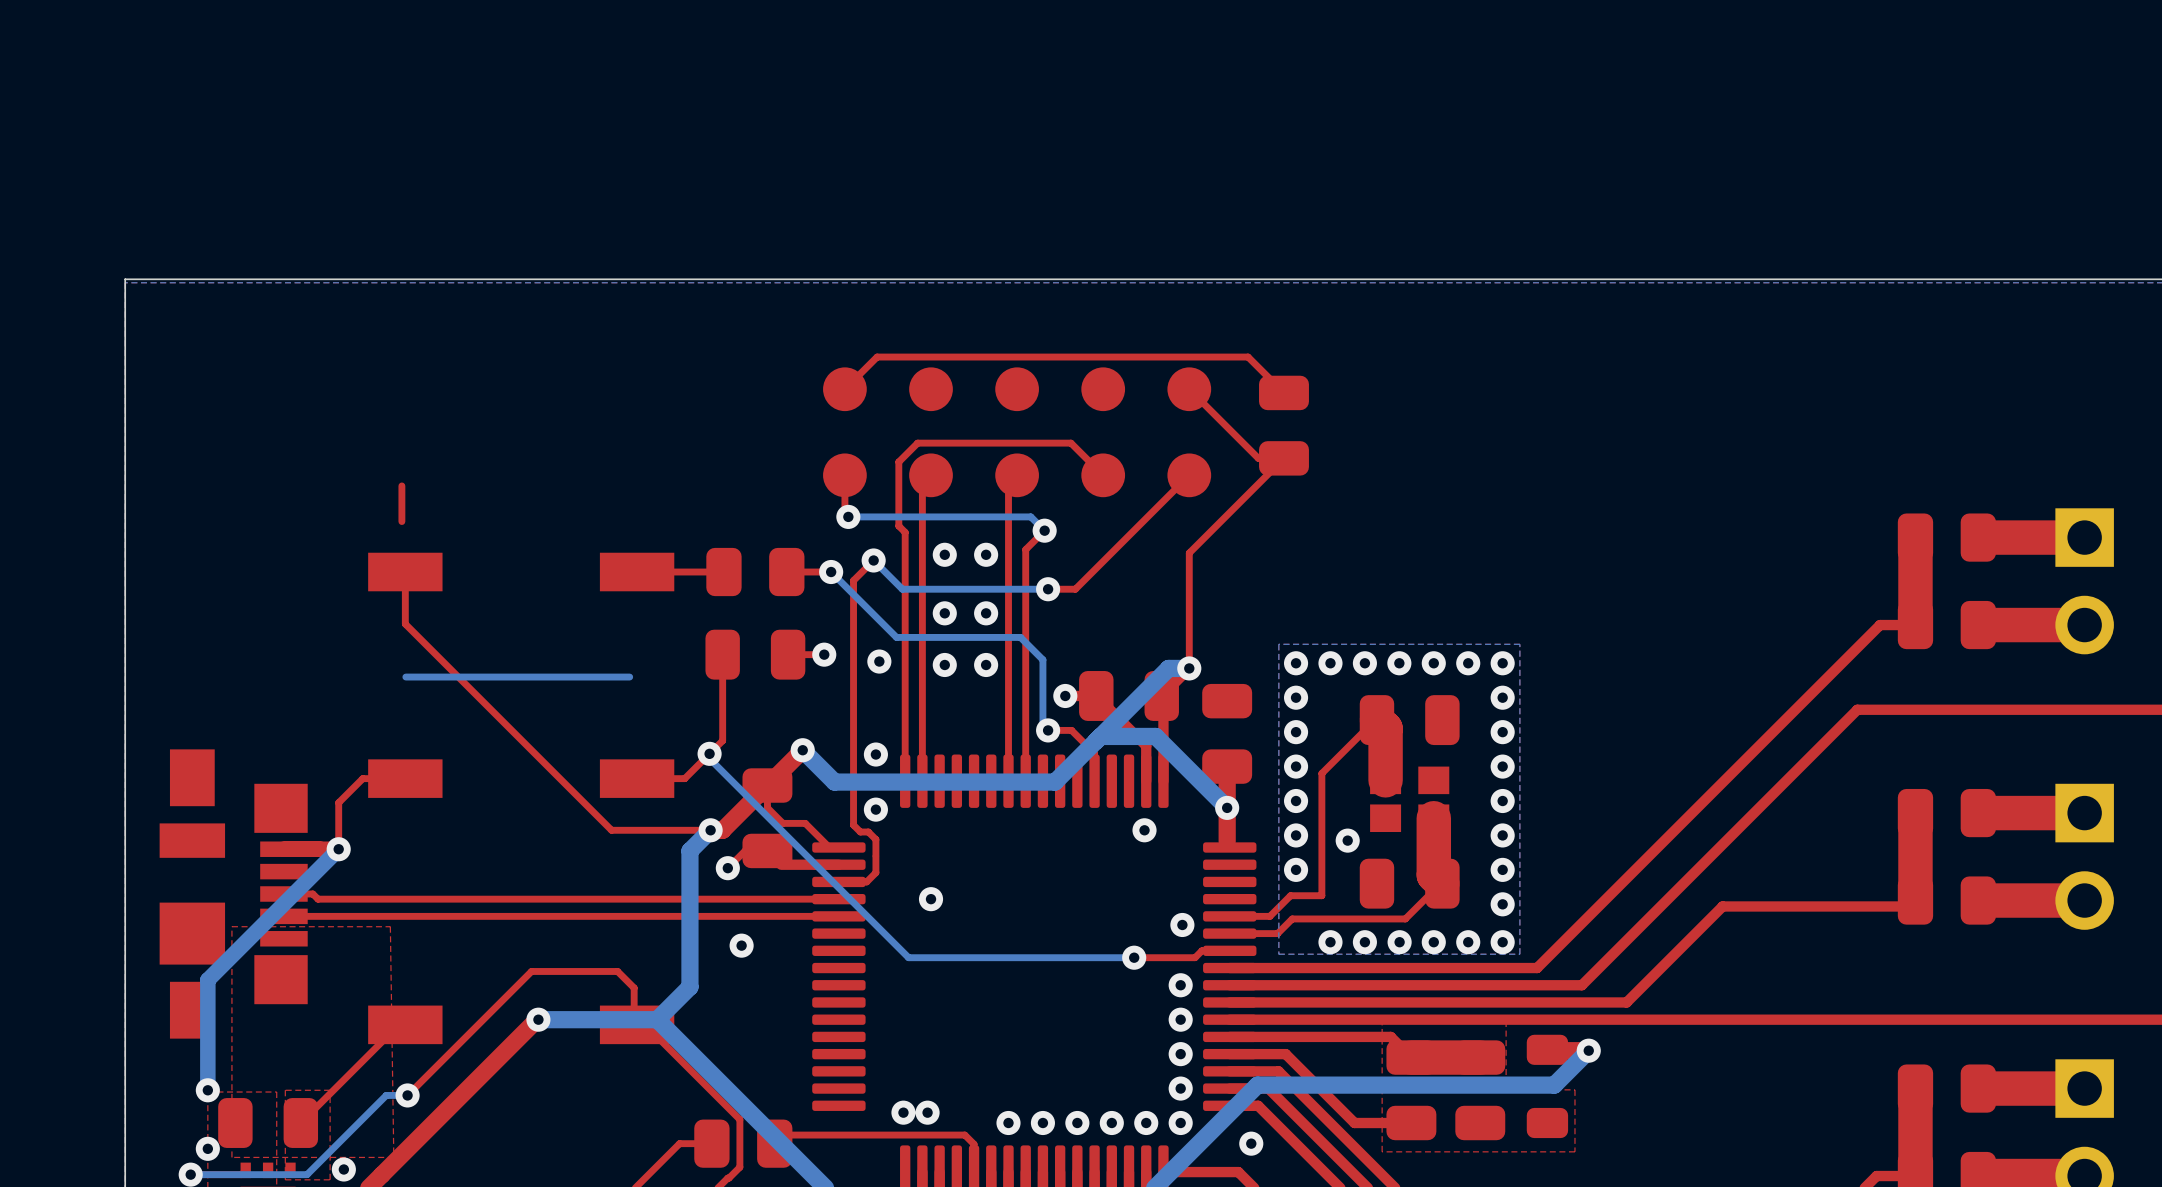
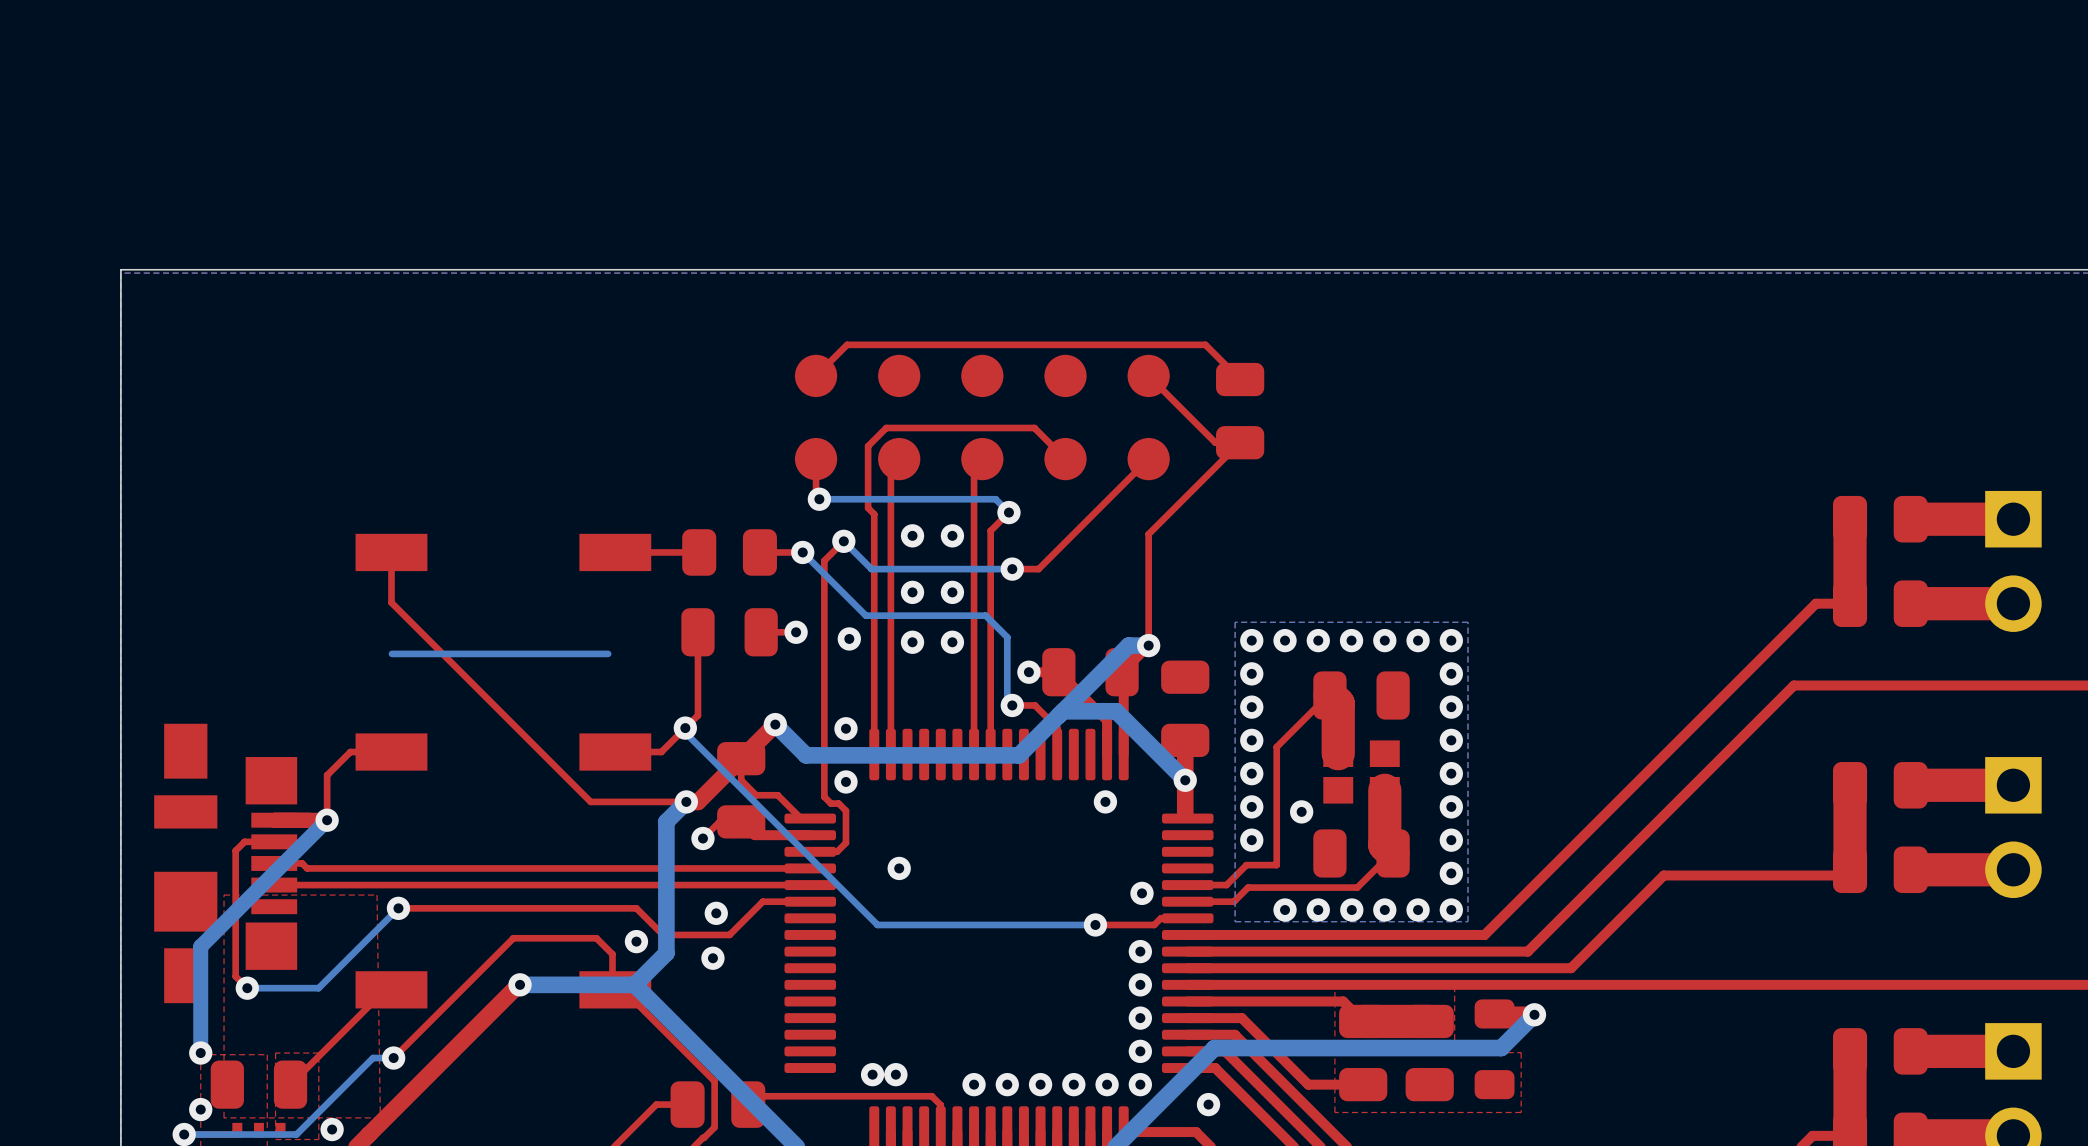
top track: (401, 485) (401, 521) -> none
top track: none -> (274, 841) (244, 841) (235, 850) (235, 976) (247, 988)
top track: none -> (810, 901) (762, 901) (729, 934) (663, 934) (636, 908) (398, 908)
bottom track: none -> (398, 908) (318, 988) (247, 988)
via: none -> (398, 908)
via: none -> (636, 941)
via: none -> (712, 958)
via: none -> (247, 988)

